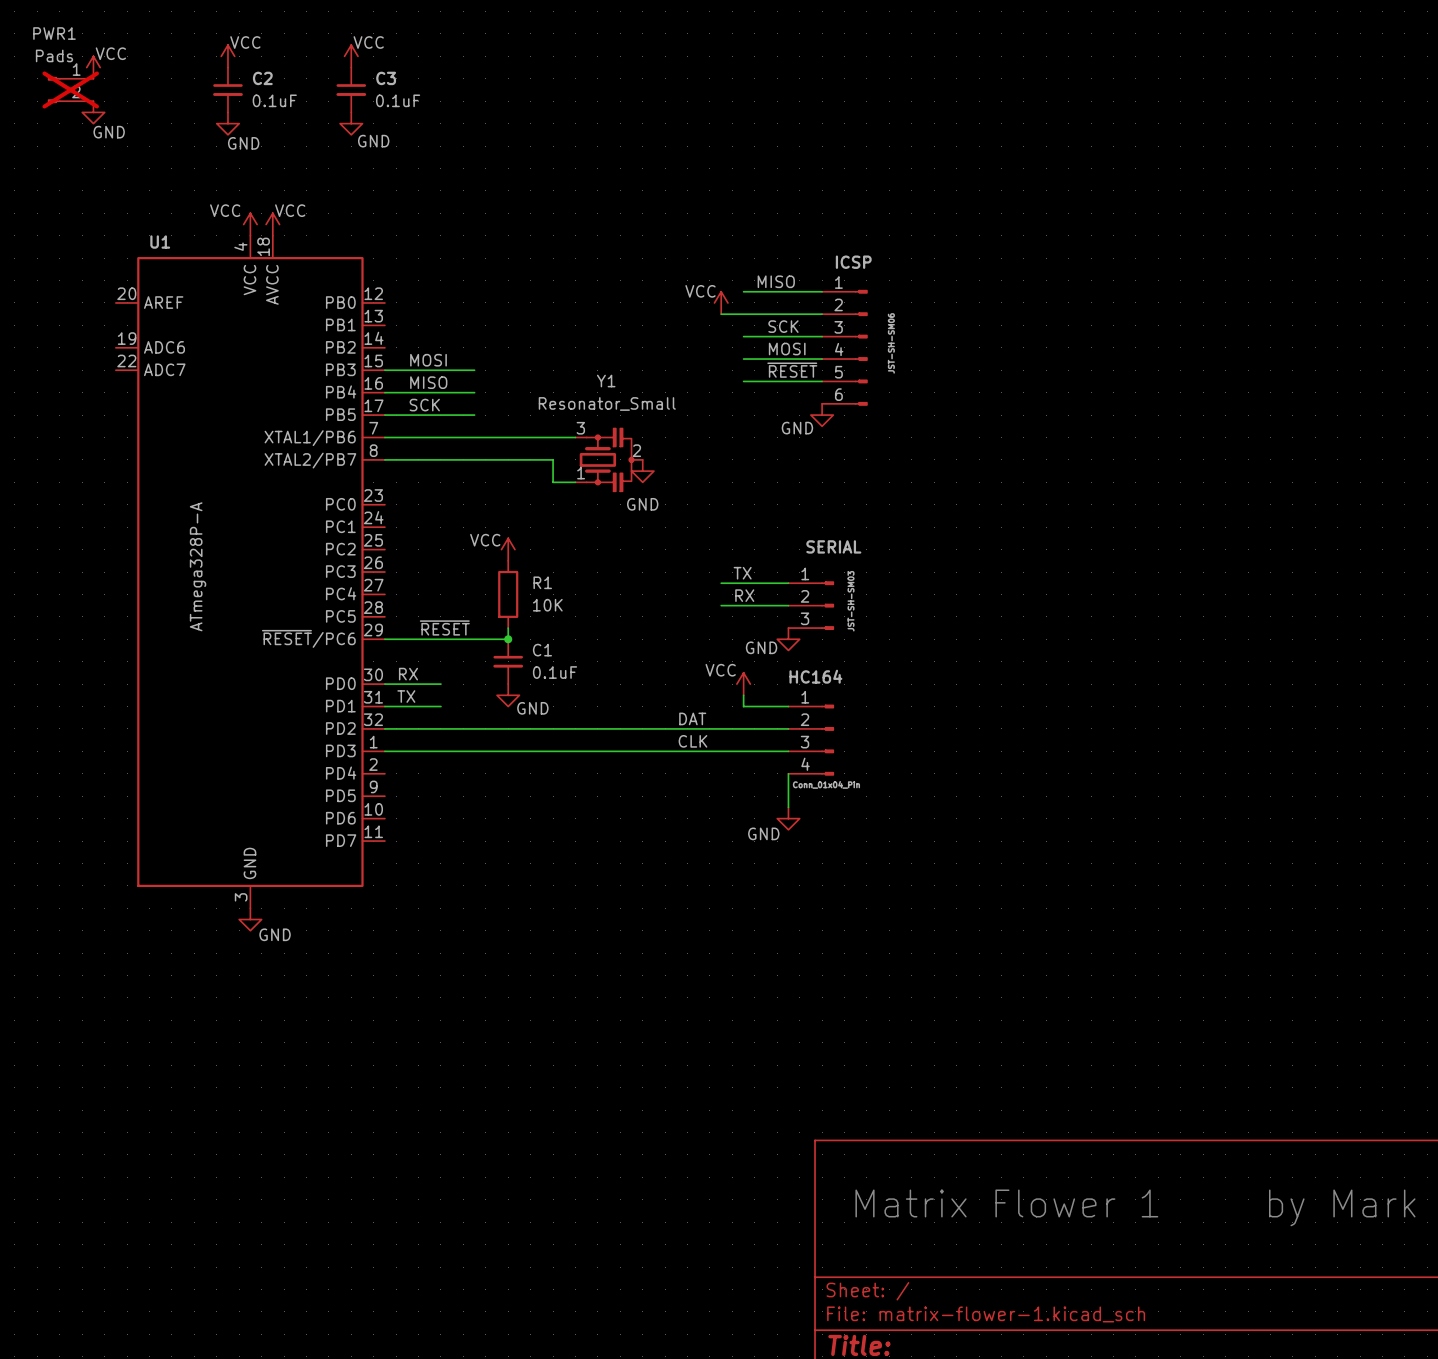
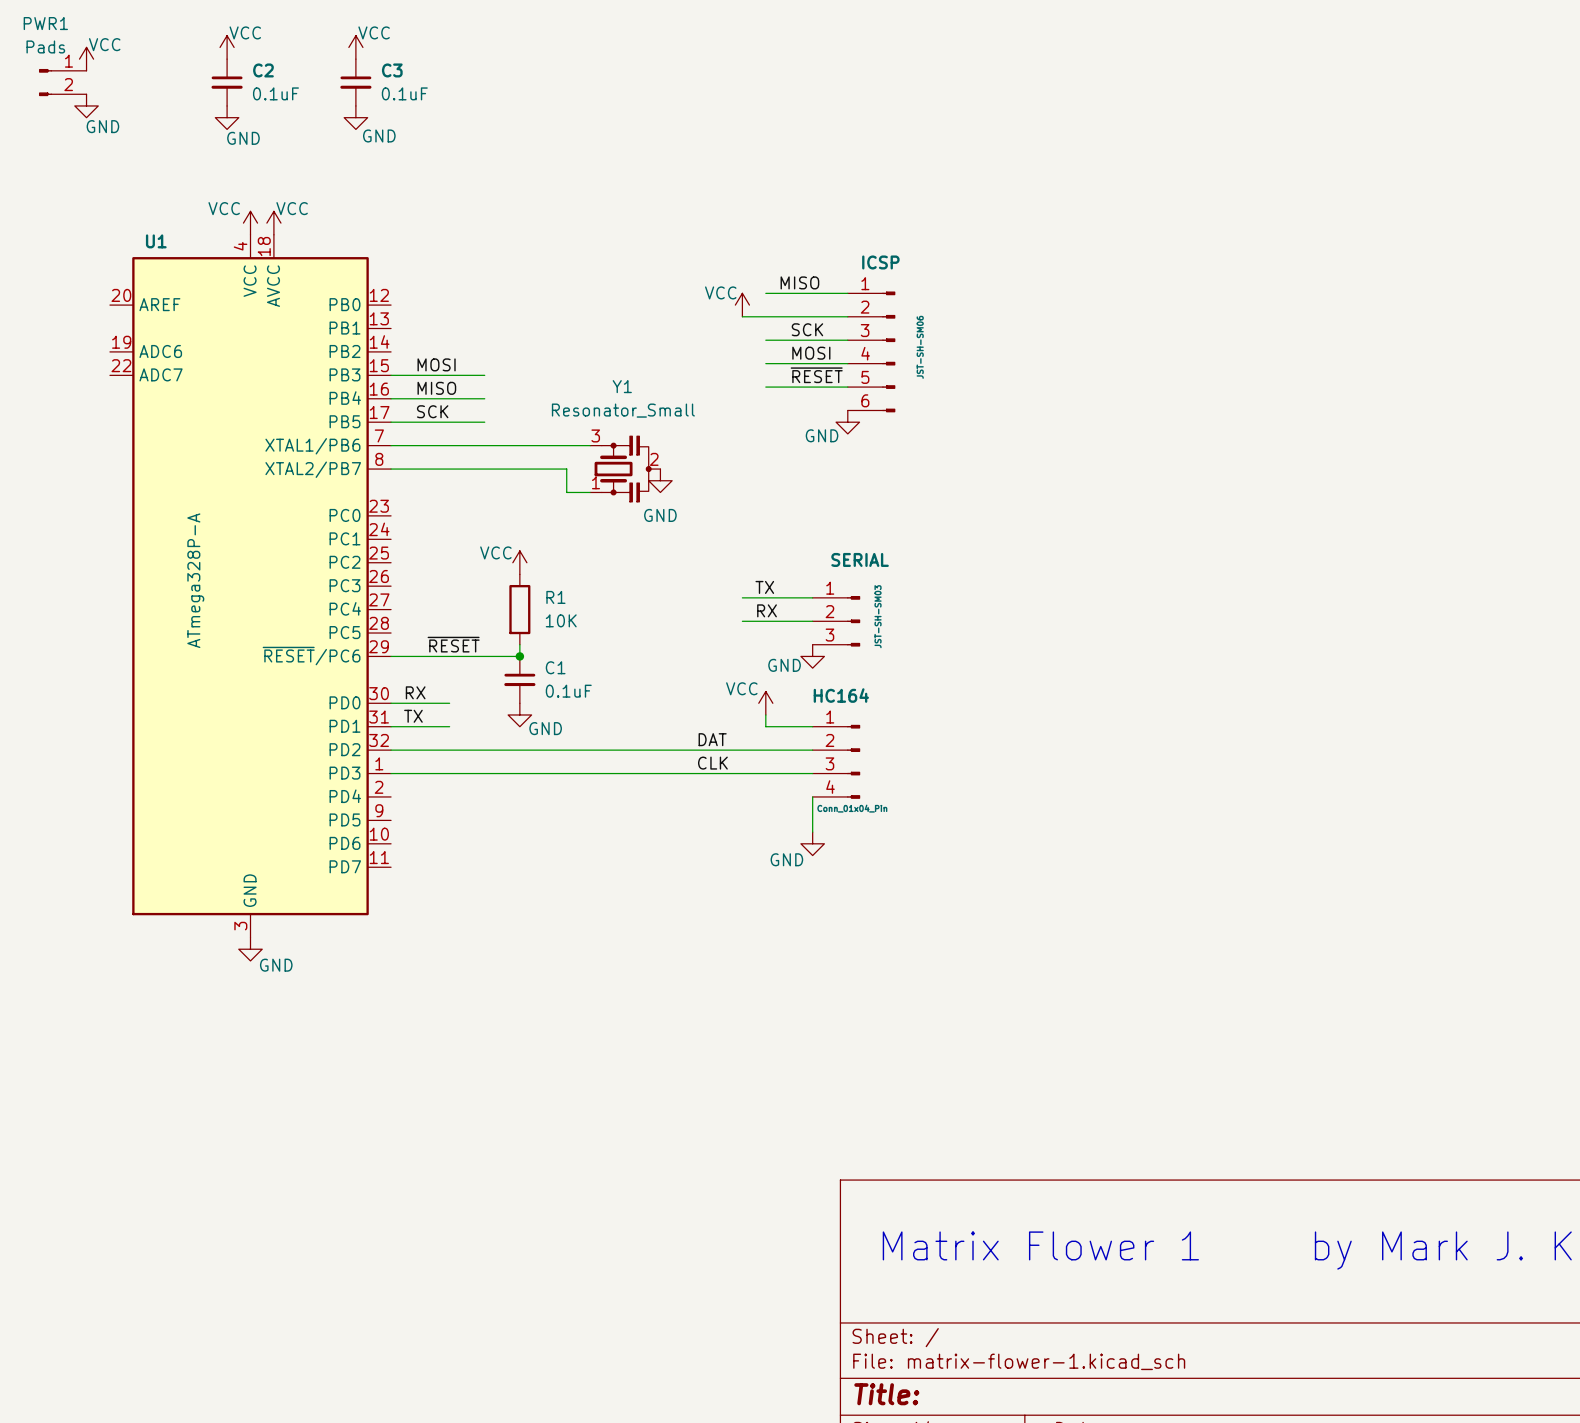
PWR1 do-not-place cross: (70, 89) -> none

